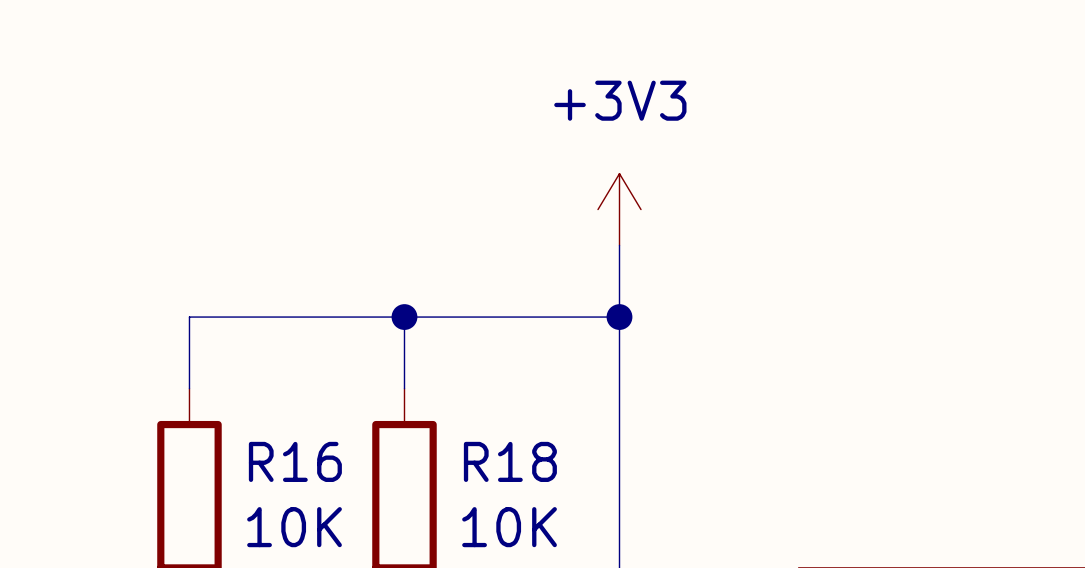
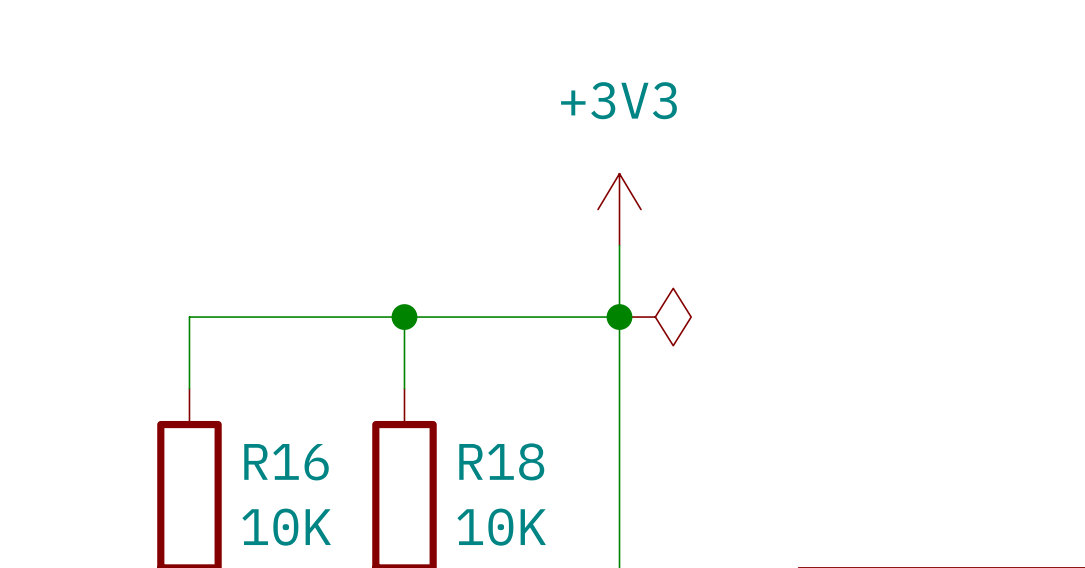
power symbol: none -> (655, 317)

